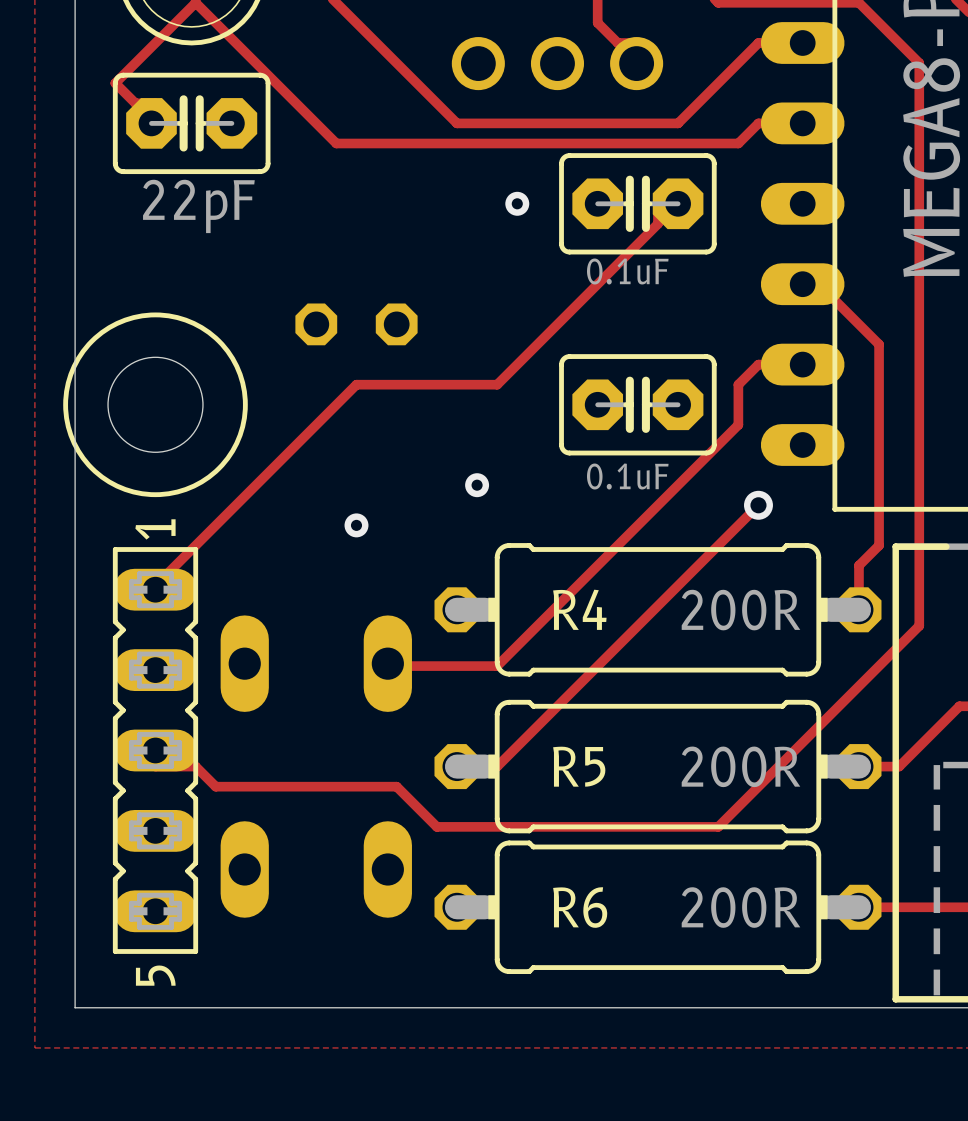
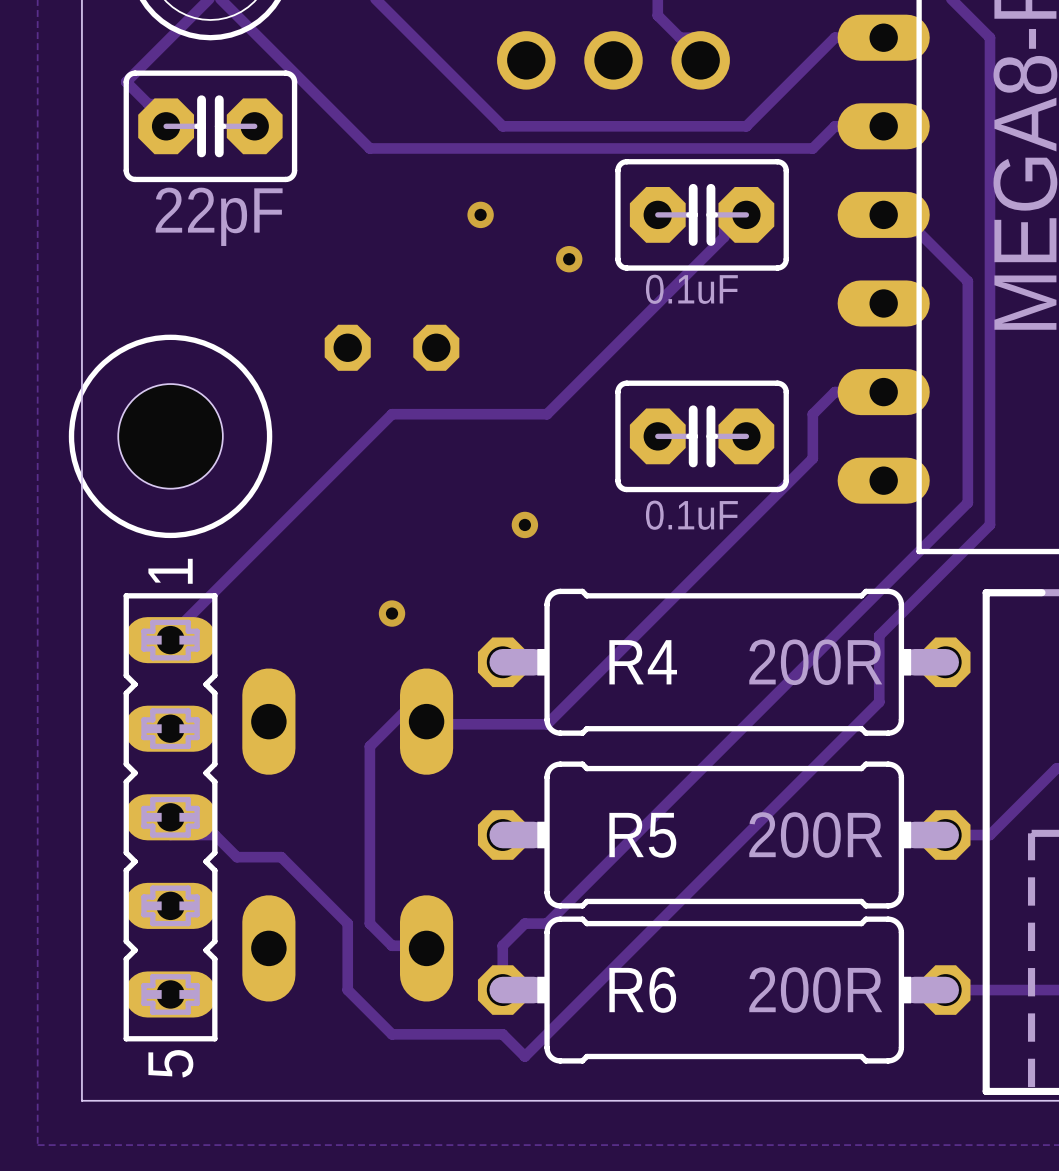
track: (899, 43) (919, 63) (919, 625) (718, 826) (436, 826) (396, 786) (255, 786) -> (989, 37) (989, 524) (879, 635) (879, 702) (524, 1056) (502, 1034) (392, 1034) (347, 990) (347, 923) (281, 857)
via: none -> (480, 214)
via: (517, 203) -> none
via: none -> (569, 259)
track: (802, 284) (818, 284) (879, 344) -> (883, 214) (901, 214) (967, 281) (967, 369)
track: (879, 465) (879, 545) (858, 565) (858, 609) -> (967, 502) (547, 923) (524, 923) (502, 945) (502, 990)
track: (758, 505) (497, 766) (456, 766) -> none
via: (758, 505) -> none
via position: (356, 525) -> (392, 613)
track: none -> (426, 721) (414, 702) (369, 746) (369, 923) (392, 945) (414, 945) (426, 948)

